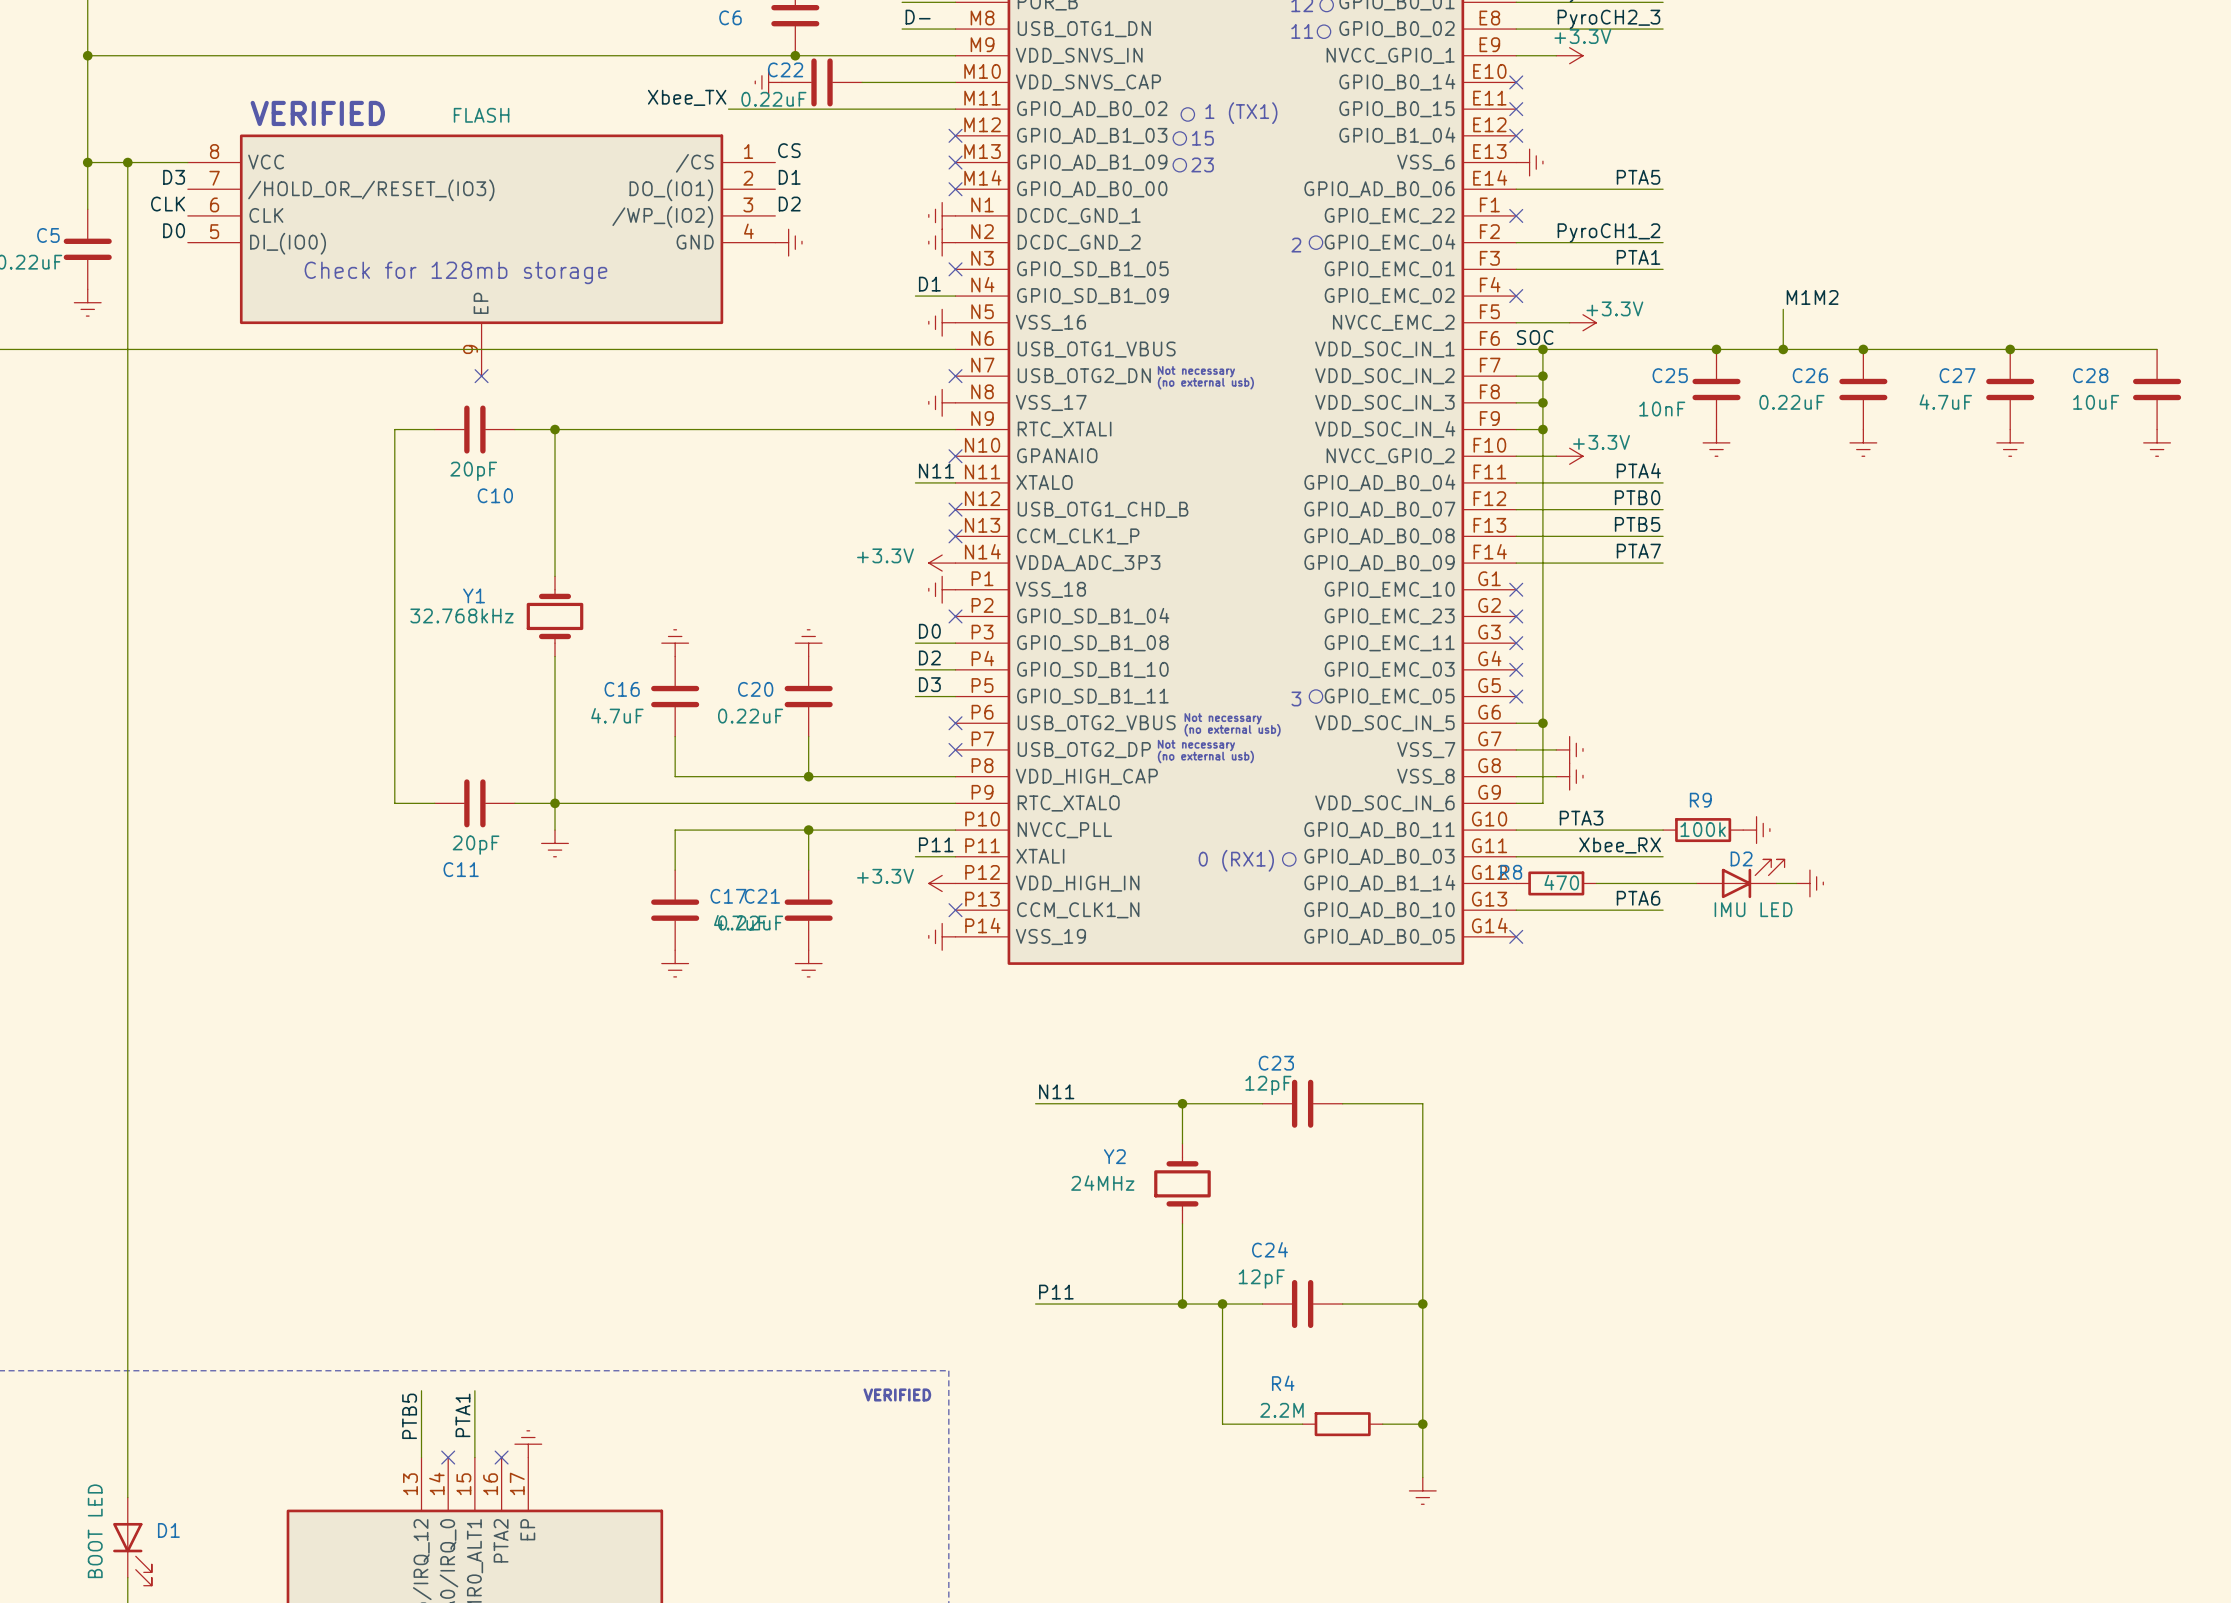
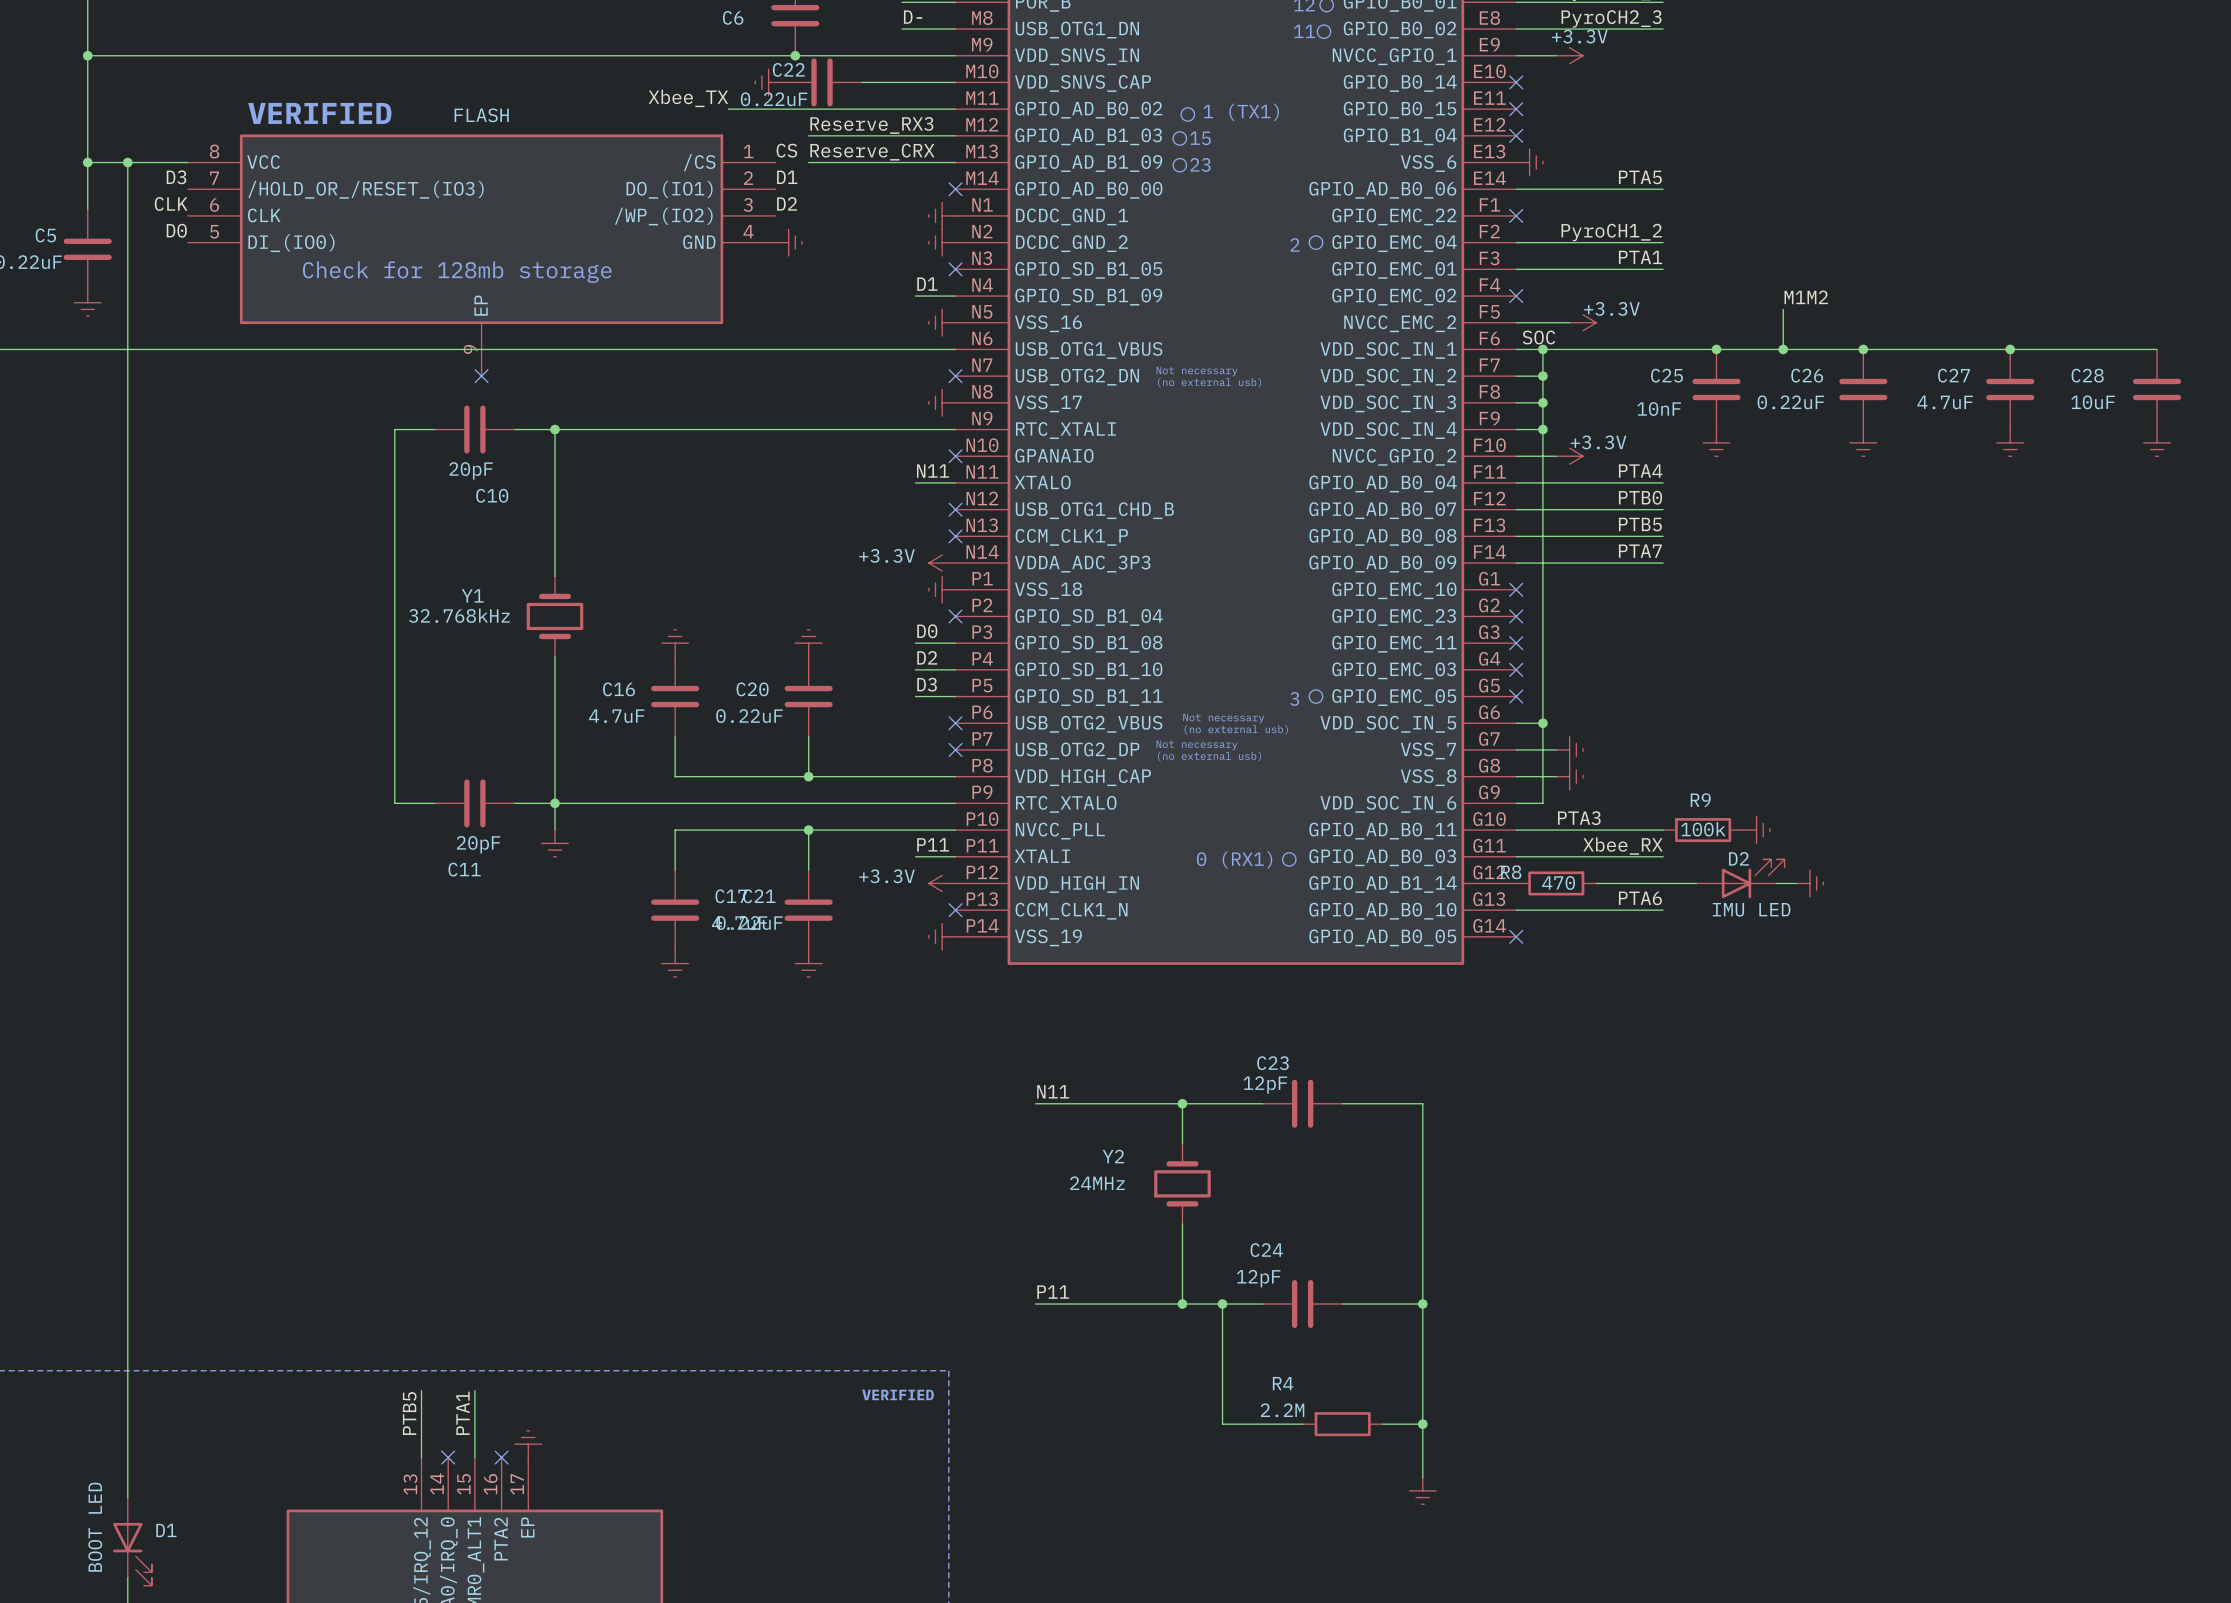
label: none -> Reserve_RX3 (871, 125)
wire: none -> (808, 135) (955, 135)
no-connect mark: (955, 135) -> none
label: none -> Reserve_CRX (872, 152)
wire: none -> (808, 162) (955, 162)
no-connect mark: (955, 162) -> none

